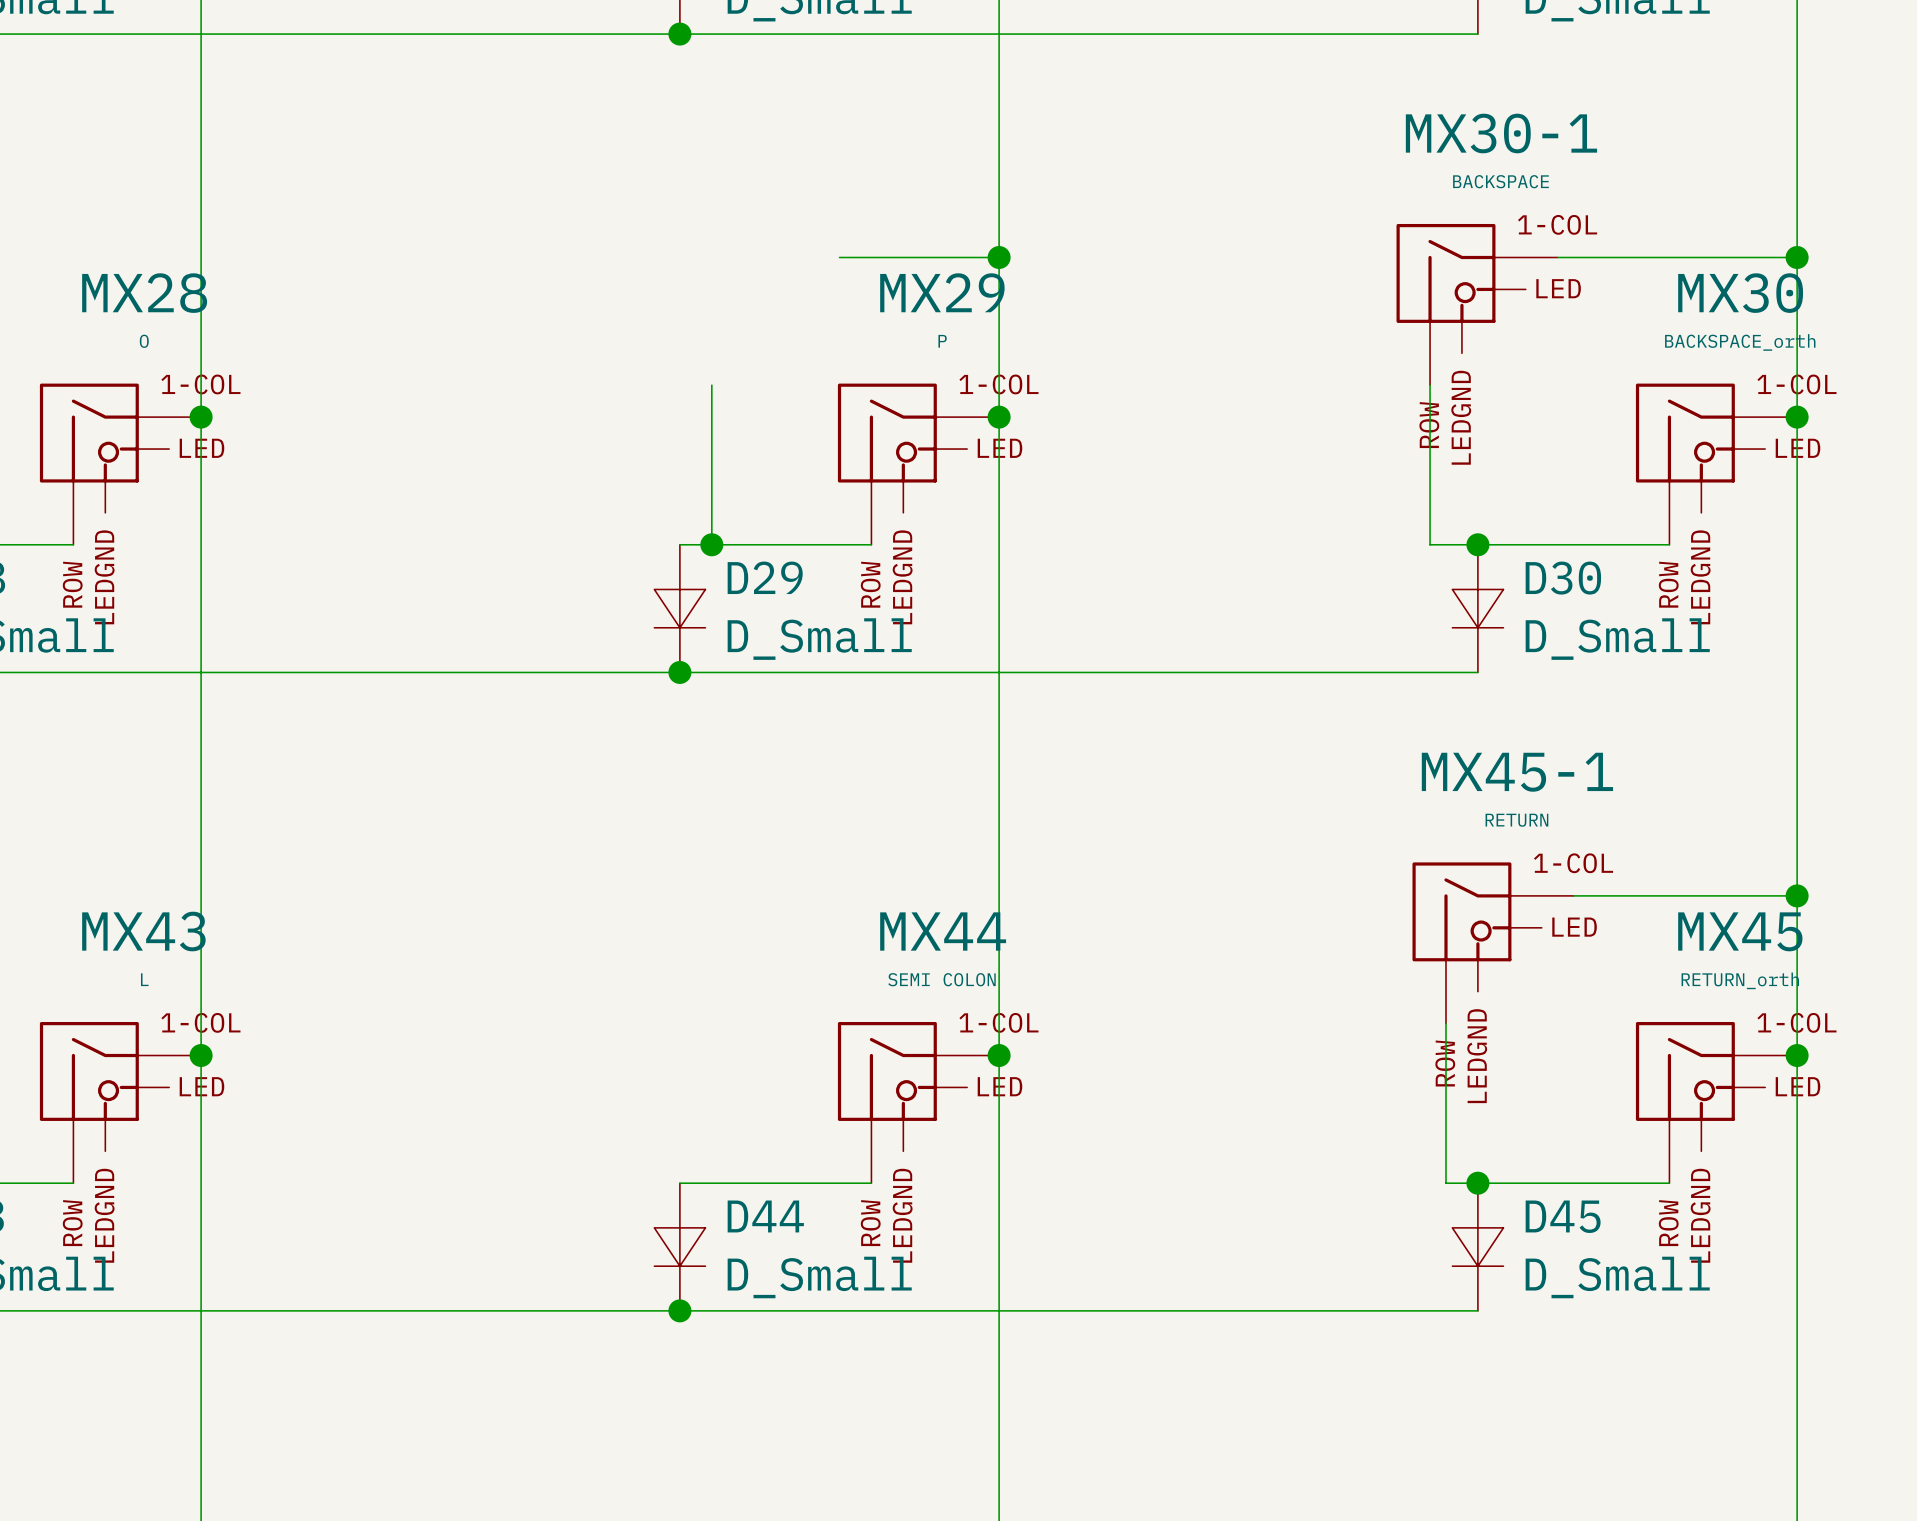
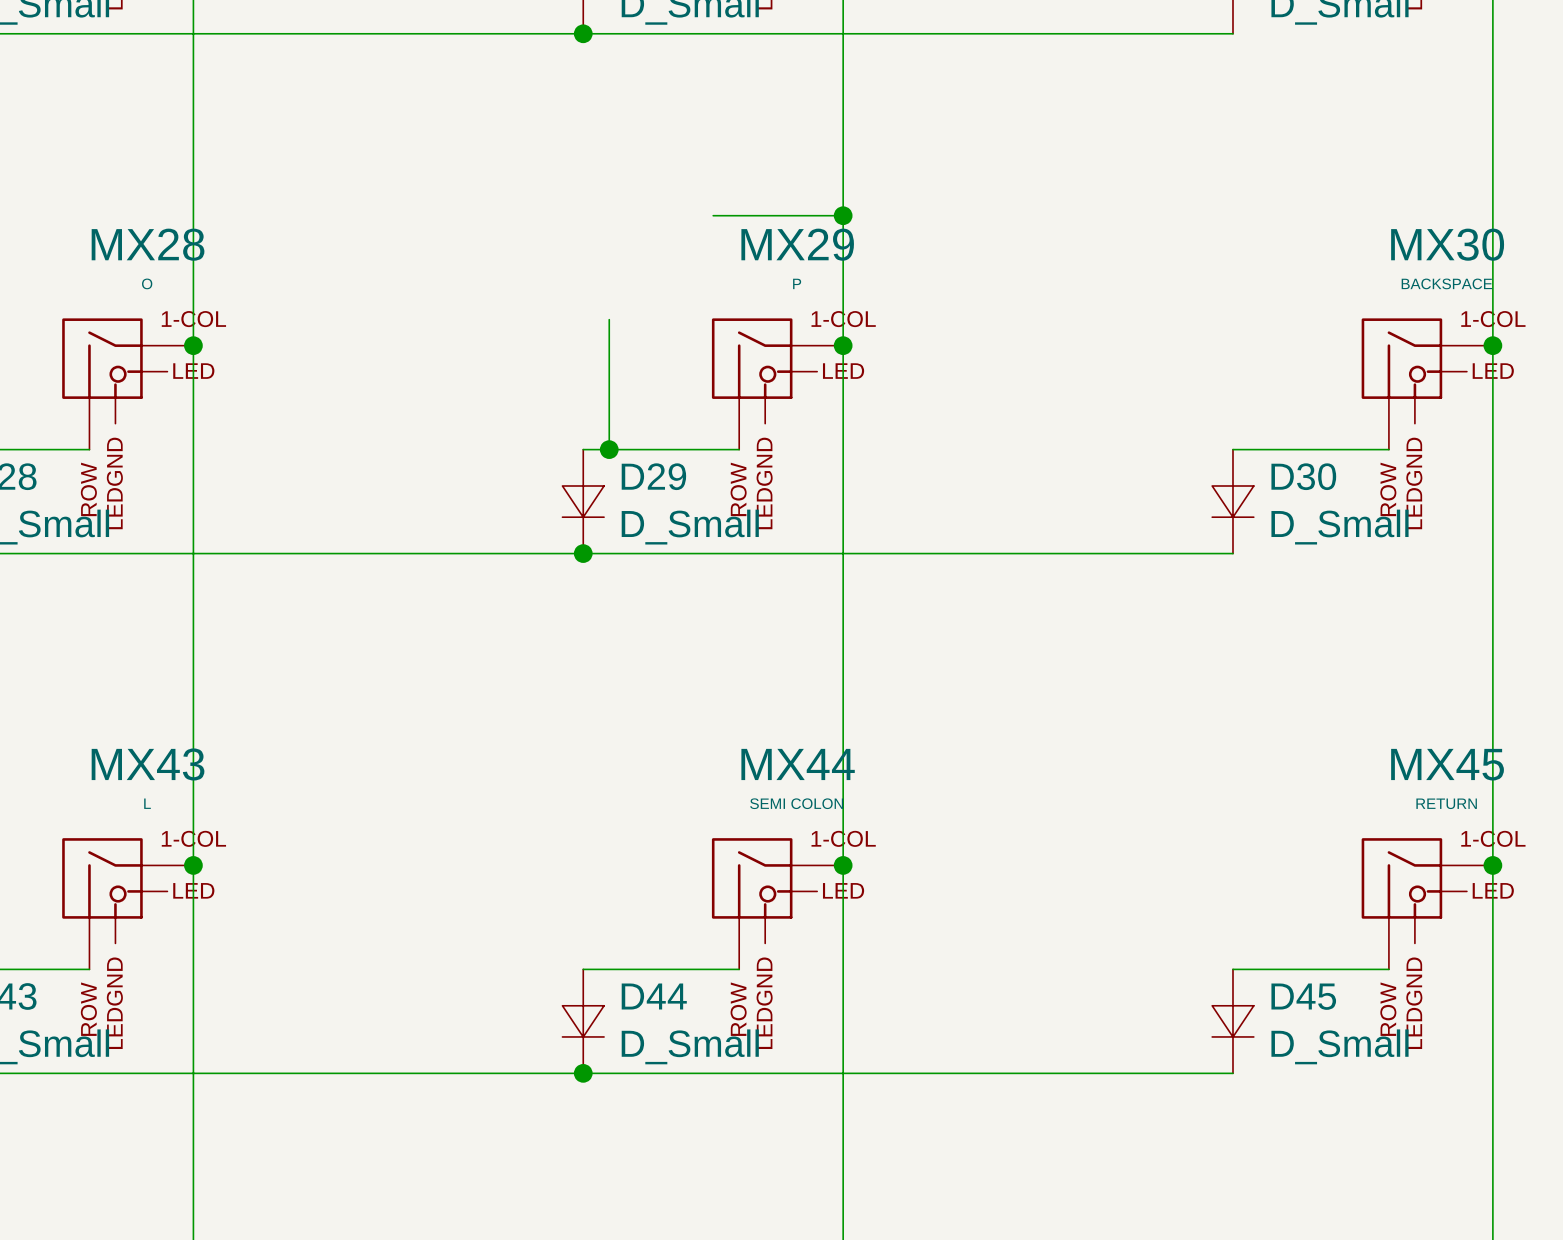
wire: (1557, 257) (1797, 257) -> none
junction: (1797, 257) -> none
MX30-1: BACKSPACE (1477, 304) -> none
MX30 value: BACKSPACE_orth (1740, 342) -> BACKSPACE (1446, 283)
wire: (1430, 385) (1430, 544) (1477, 544) -> none
junction: (1477, 544) -> none
wire: (1573, 895) (1797, 895) -> none
junction: (1797, 895) -> none
MX45-1: RETURN (1493, 942) -> none
MX45 value: RETURN_orth (1740, 980) -> RETURN (1446, 803)
wire: (1445, 1023) (1445, 1183) (1477, 1183) -> none
junction: (1477, 1183) -> none

